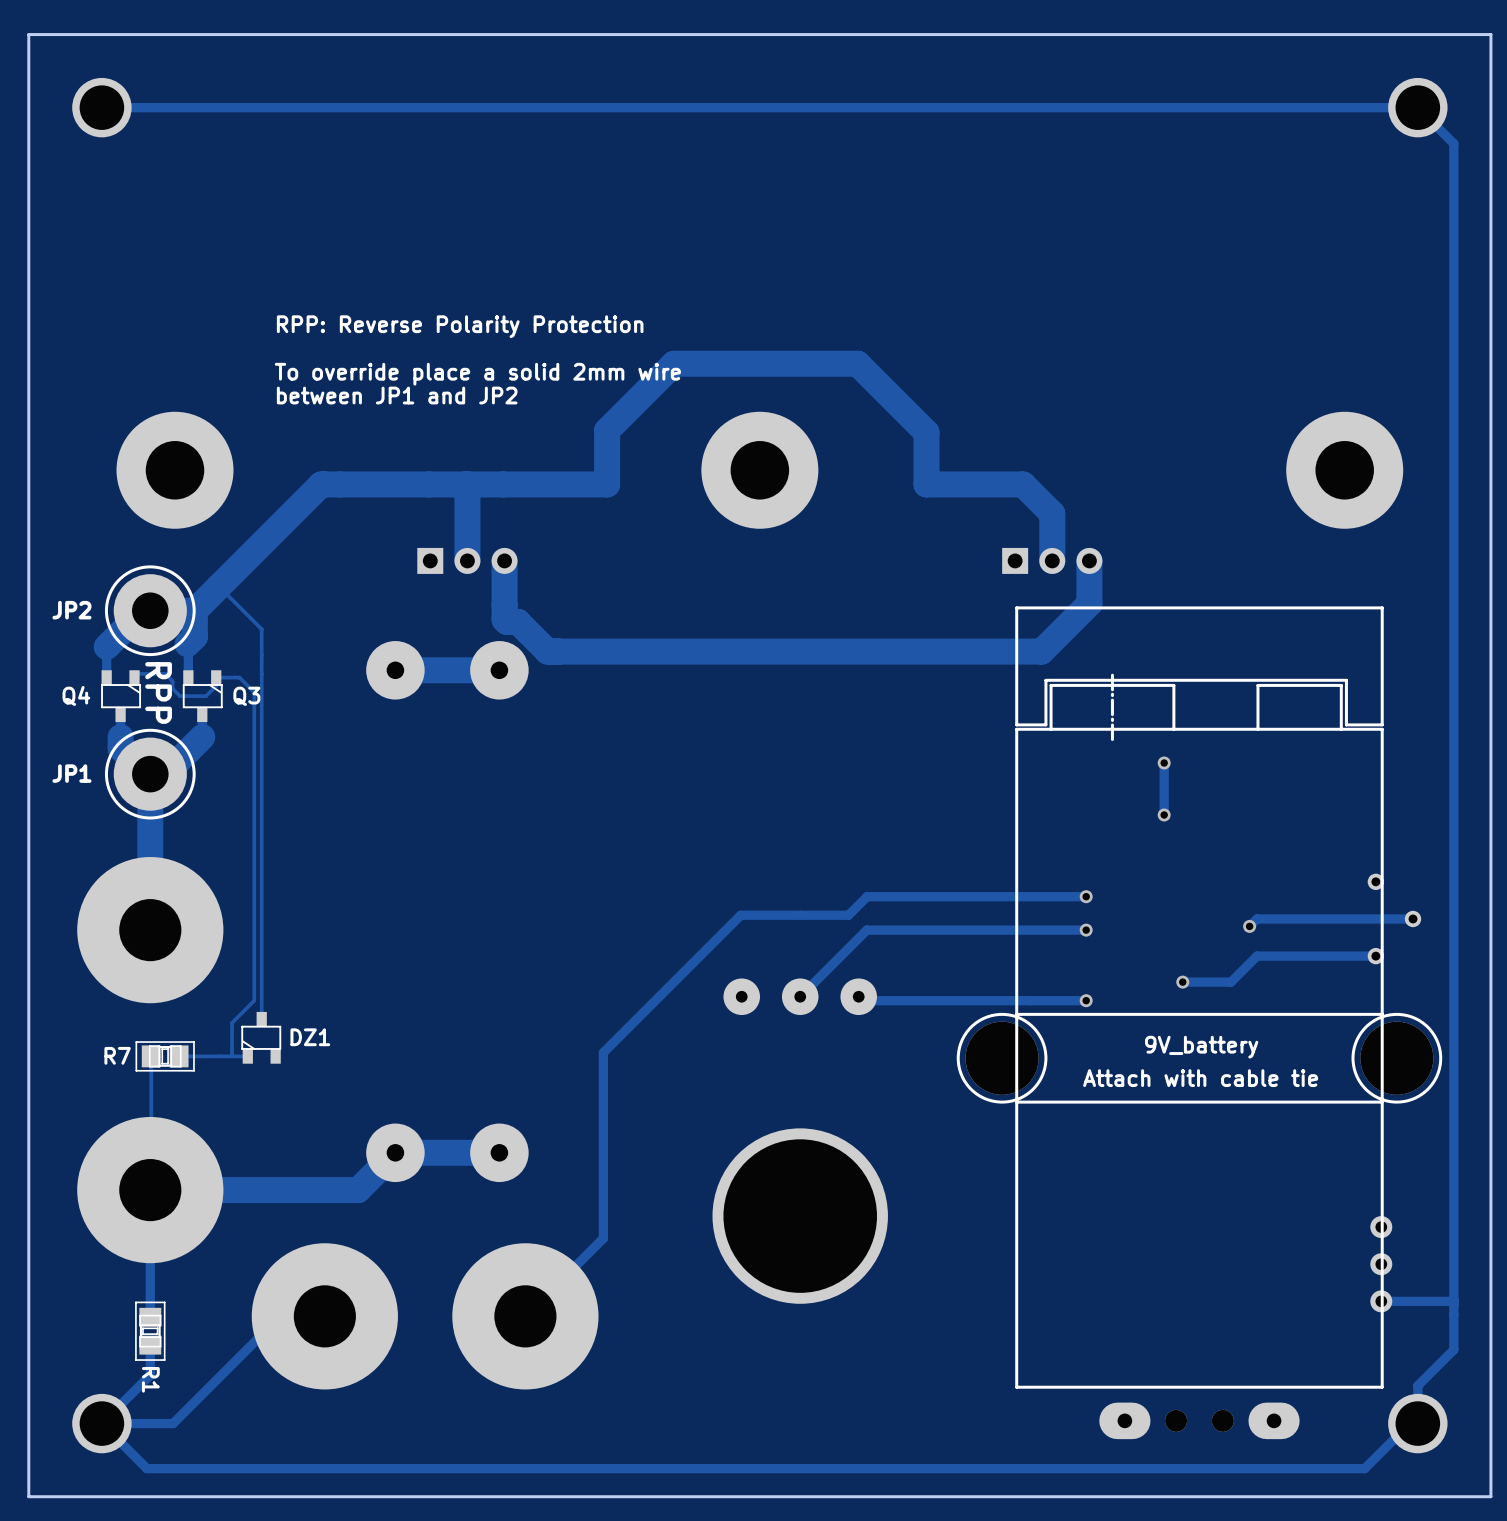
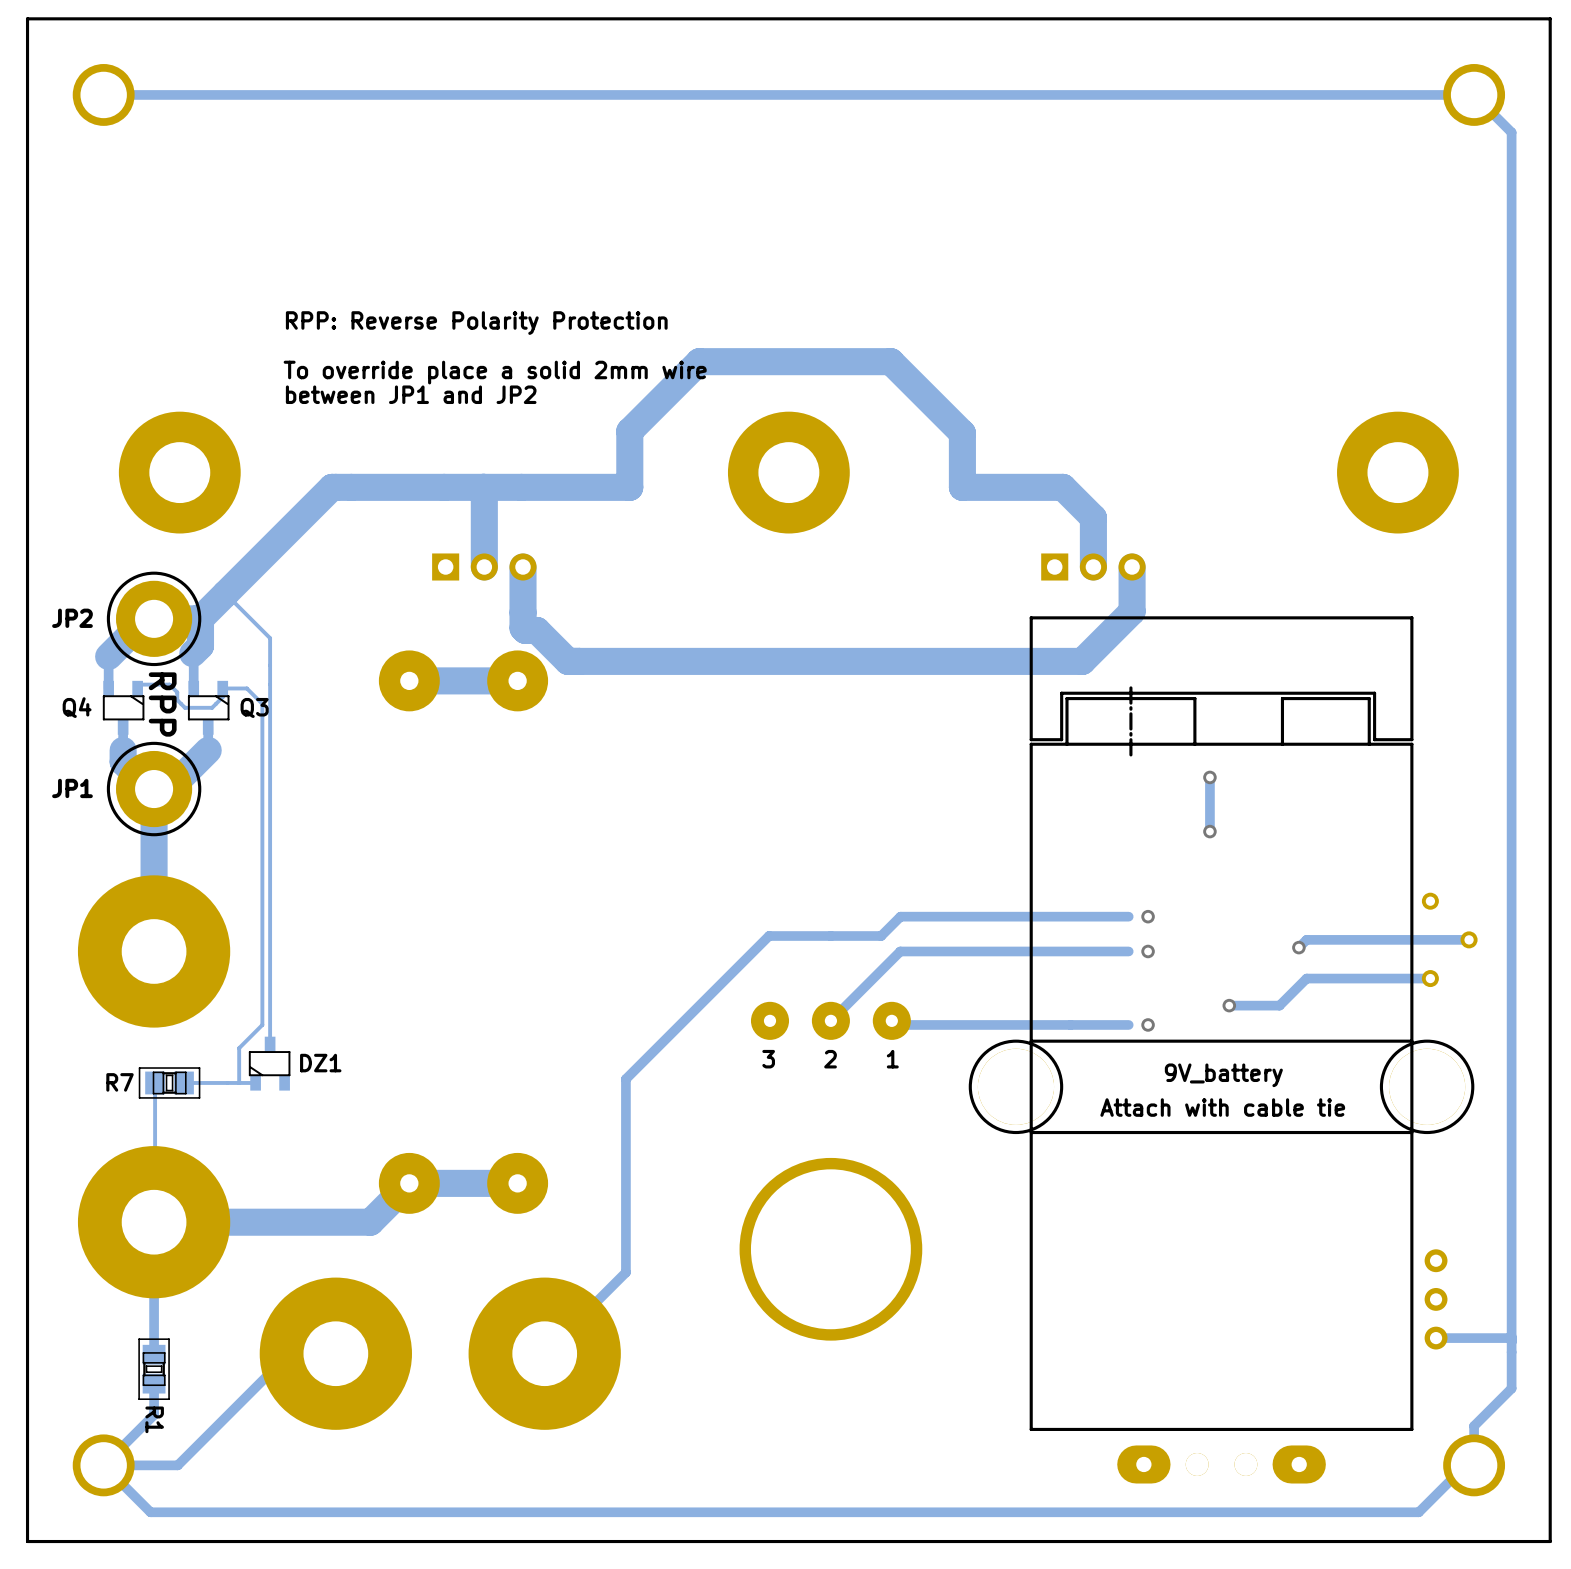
via position: (1086, 896) -> (1148, 916)
via position: (1086, 930) -> (1148, 951)
via position: (1086, 1000) -> (1148, 1024)
part position: (1199, 1022) -> (1221, 1049)
text: none -> 3 (768, 1059)
text: none -> 2 (830, 1059)
text: none -> 1 (892, 1059)

